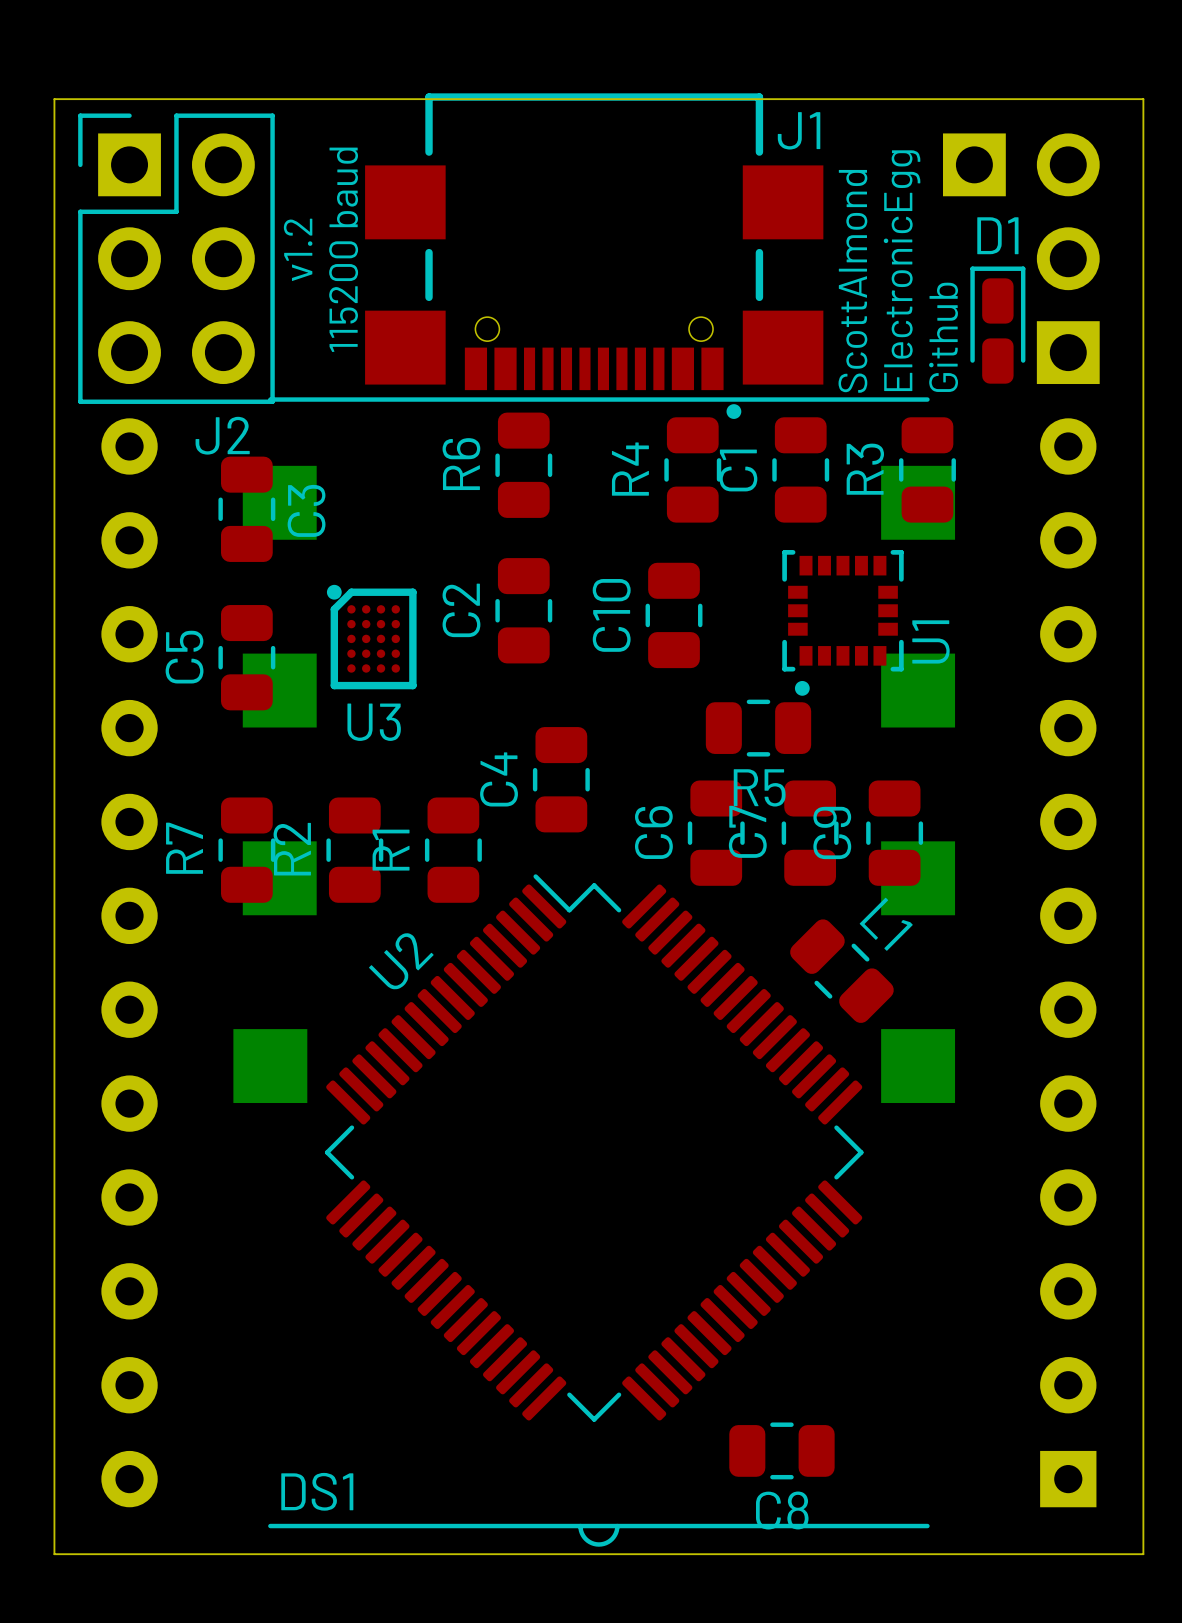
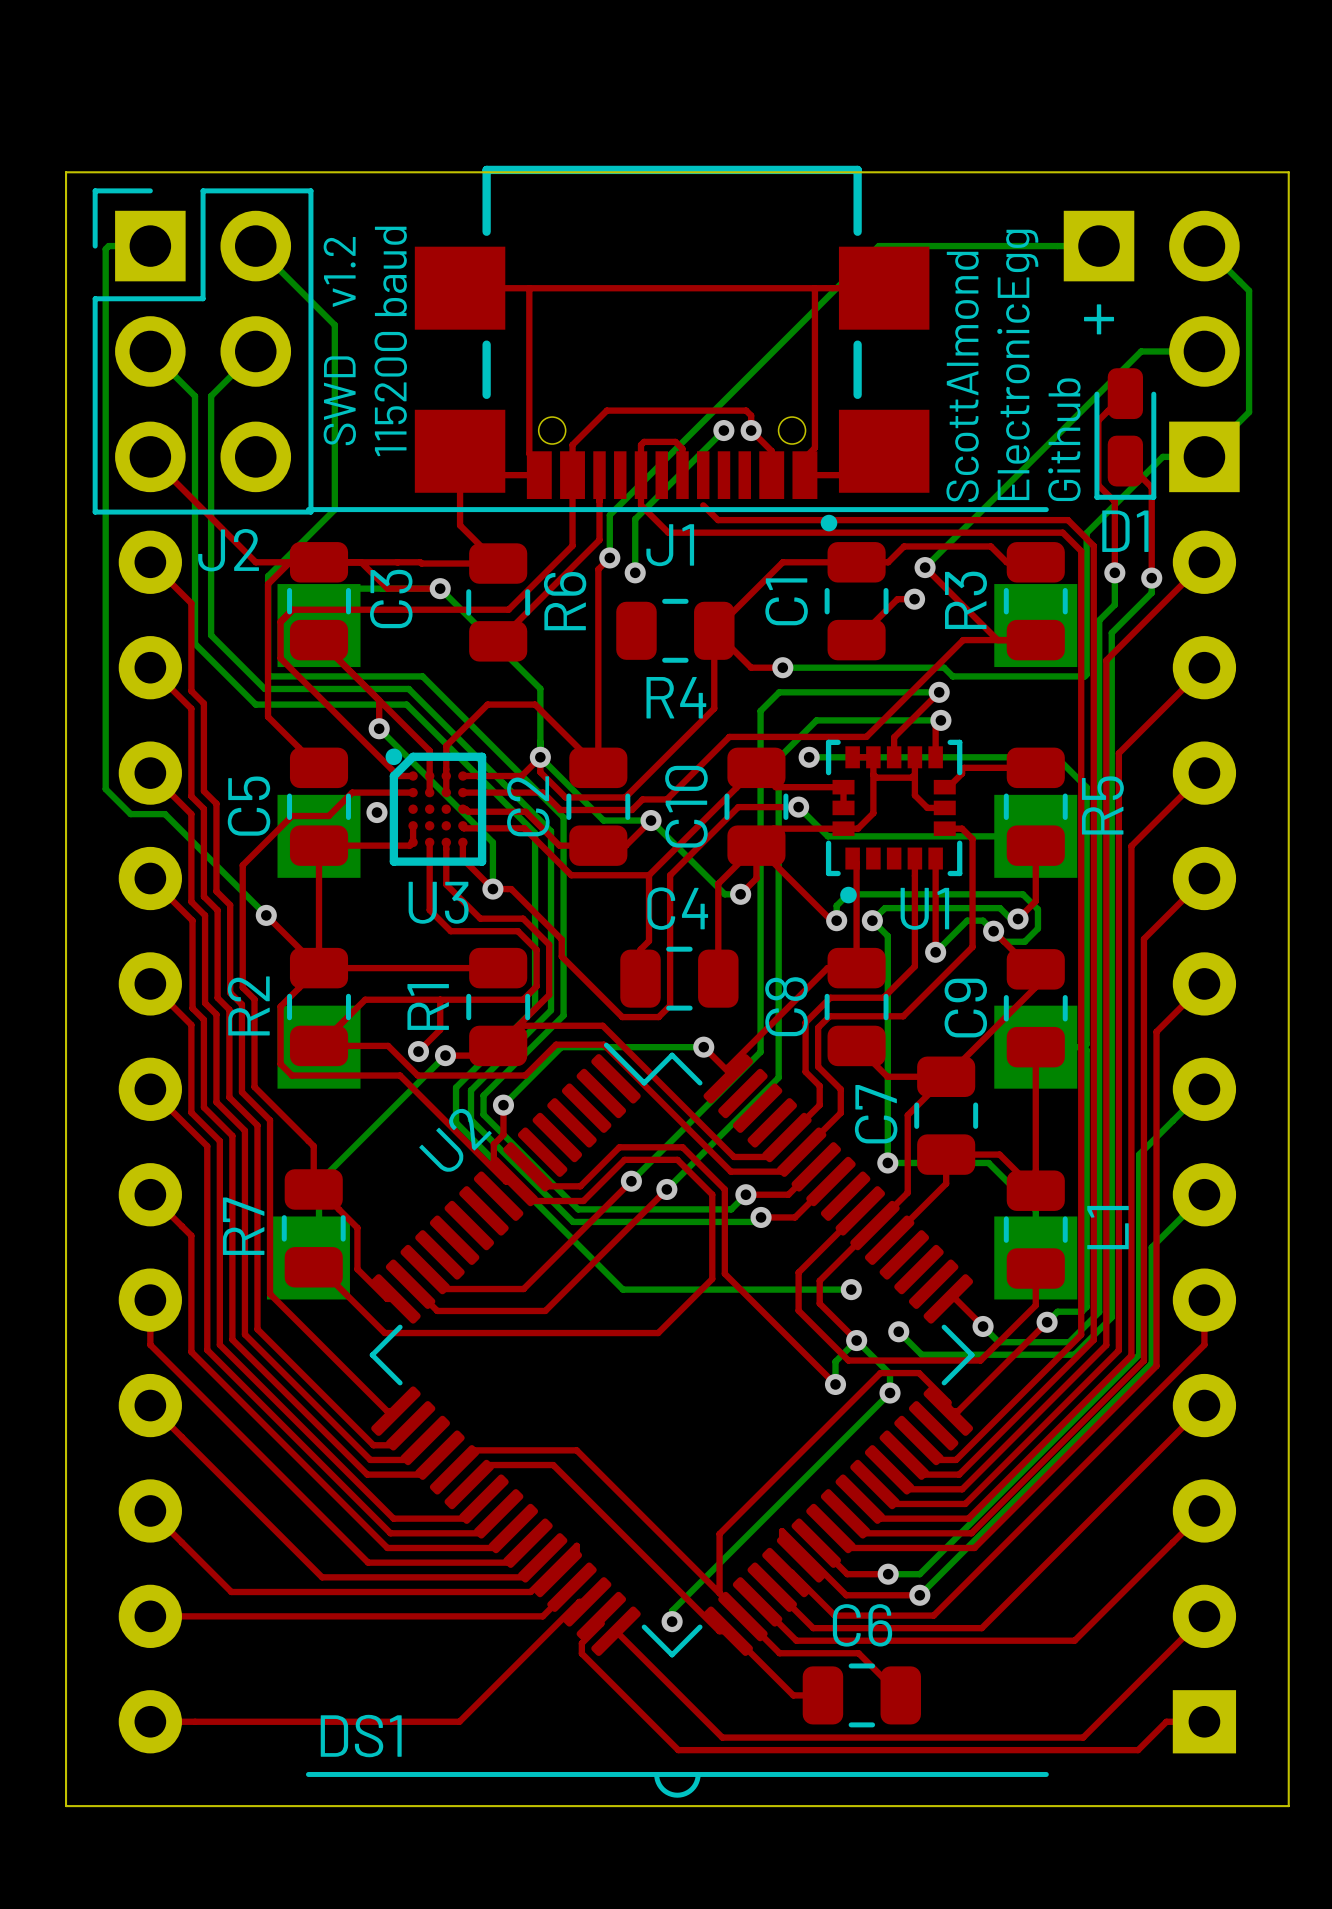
J1 name position: J1 (799, 130) -> J1 (670, 545)
bottom track: none -> (150, 246) (108, 246) (105, 249) (105, 789) (130, 814) (165, 814) (266, 915)
bottom track: none -> (255, 246) (334, 325) (334, 509) (268, 576) (268, 674) (270, 676) (422, 676) (563, 817) (563, 1015) (483, 1095) (483, 1114) (578, 1209) (731, 1209) (745, 1194)
bottom track: none -> (1099, 246) (878, 246) (609, 515) (609, 557)
bottom track: none -> (1204, 246) (1249, 290) (1249, 412) (1204, 456) (1162, 456) (1086, 533) (1086, 674) (1084, 676) (952, 676) (944, 667) (782, 667)
top track: none -> (460, 288) (884, 288)
top track: none -> (529, 288) (529, 453) (539, 463) (539, 475) (483, 475) (460, 451) (460, 525) (498, 563) (255, 562) (150, 456)
top track: none -> (814, 288) (814, 447) (804, 457) (804, 475) (860, 475) (884, 451)
text: none -> + (1099, 319)
text: v1.2 (298, 249) -> SWD v1.2 (339, 341)
bottom track: none -> (150, 351) (195, 396) (195, 643) (255, 704) (406, 704) (535, 833) (535, 1008) (456, 1087) (456, 1122) (622, 1289) (851, 1289)
bottom track: none -> (255, 351) (211, 396) (211, 635) (264, 688) (408, 688) (551, 831) (551, 1010) (470, 1090) (470, 1119) (573, 1221) (756, 1221) (761, 1217)
bottom track: none -> (1204, 351) (1141, 351) (925, 567)
top track: none -> (1125, 393) (1098, 420) (1098, 485) (1114, 501) (1114, 572)
D1 rotation: 0° (997, 325) -> 180° (1125, 434)
bottom track: none -> (723, 430) (635, 519) (635, 572)
via: none -> (723, 430)
via: none -> (751, 430)
top track: none -> (1125, 461) (1151, 487) (1151, 578)
top track: none -> (599, 475) (599, 540) (498, 641)
top track: none -> (682, 475) (682, 448) (675, 441) (644, 441) (640, 444) (640, 505) (668, 532) (1062, 532) (1081, 551) (1081, 1334) (956, 1459) (938, 1459) (918, 1440)
top track: none -> (771, 475) (771, 451) (751, 430) (751, 415) (746, 410) (606, 410) (572, 444) (572, 545) (508, 609) (292, 609) (280, 621) (280, 658) (398, 776) (413, 776)
top track: none -> (703, 505) (718, 520) (1067, 520) (1093, 545) (1093, 1340) (959, 1474) (923, 1474) (904, 1455)
J2 name position: J2 (222, 435) -> J2 (228, 550)
top track: none -> (609, 557) (598, 569) (598, 767) (535, 704) (487, 704) (446, 745) (446, 792)
via: none -> (609, 557)
top track: none -> (150, 562) (191, 603) (191, 690) (203, 703) (203, 791) (216, 803) (216, 891) (230, 905) (230, 992) (241, 1004) (241, 1092) (270, 1120) (270, 1294) (387, 1411) (395, 1411)
top track: none -> (289, 562) (268, 584) (268, 716) (319, 767)
top track: none -> (361, 562) (387, 588) (440, 588)
top track: none -> (1035, 562) (1006, 562) (990, 546) (904, 546) (888, 562) (782, 562) (714, 630)
top track: none -> (1204, 562) (1106, 660) (1106, 1345) (962, 1489) (909, 1489) (889, 1469)
top track: none -> (925, 567) (997, 640)
via: none -> (925, 567)
via: none -> (635, 572)
bottom track: none -> (1114, 572) (1114, 604) (1099, 620) (1099, 1312) (1069, 1342) (998, 1342) (983, 1326)
via: none -> (1114, 572)
bottom track: none -> (1151, 578) (1151, 593) (1111, 632) (1111, 1317) (1074, 1354) (921, 1354) (898, 1331)
via: none -> (1151, 578)
R6 name position: R6 (461, 464) -> R6 (565, 601)
R6 position: (523, 465) -> (498, 602)
via: none -> (440, 588)
R4 name position: R4 (630, 469) -> R4 (676, 697)
R4 rotation: 0° (692, 469) -> 90° clockwise (675, 630)
R4 position: (692, 469) -> (675, 630)
C1 position: (800, 469) -> (856, 601)
R3 position: (927, 469) -> (1035, 601)
top track: none -> (914, 599) (897, 599) (856, 640)
via: none -> (914, 599)
bottom track: none -> (319, 625) (355, 588) (440, 588) (540, 688) (540, 757) (603, 820) (651, 820) (724, 894) (740, 894)
top track: none -> (714, 630) (714, 708) (625, 797) (565, 797) (540, 772) (540, 757) (521, 776) (462, 776)
top track: none -> (714, 630) (751, 667) (782, 667)
C3 position: (246, 509) -> (319, 601)
C3 name position: C3 (306, 510) -> C3 (391, 598)
top track: none -> (319, 640) (429, 750) (429, 792)
top track: none -> (1035, 640) (963, 640) (866, 736) (729, 736) (666, 799)
top track: none -> (150, 667) (191, 708) (191, 796) (203, 808) (203, 896) (217, 910) (217, 997) (229, 1009) (229, 1097) (257, 1125) (257, 1329) (373, 1445) (391, 1445) (410, 1425)
via: none -> (782, 667)
top track: none -> (1204, 667) (1118, 753) (1118, 1350) (965, 1503) (894, 1503) (874, 1484)
top track: none -> (939, 692) (894, 737) (894, 757)
bottom track: none -> (939, 692) (779, 692) (760, 711) (760, 1052) (631, 1181)
via: none -> (939, 692)
top track: none -> (379, 700) (379, 728)
top track: none -> (940, 720) (935, 725) (935, 757)
bottom track: none -> (940, 720) (816, 720) (778, 758) (778, 1077) (666, 1189)
via: none -> (940, 720)
bottom track: none -> (379, 728) (492, 842) (492, 889)
via: none -> (379, 728)
C2 position: (523, 610) -> (598, 806)
C10 position: (674, 615) -> (756, 806)
via: none -> (540, 757)
bottom track: none -> (809, 757) (1056, 757) (1086, 787) (1086, 1044) (1083, 1047)
via: none -> (809, 757)
top track: none -> (852, 757) (873, 757) (873, 813) (857, 828) (773, 828) (718, 883) (718, 978)
top track: none -> (914, 757) (914, 795) (927, 807) (944, 807)
U1 position: (842, 622) -> (894, 821)
top track: none -> (1035, 767) (964, 767) (962, 773) (948, 787) (944, 787)
top track: none -> (150, 773) (191, 814) (191, 901) (205, 915) (205, 1003) (216, 1014) (216, 1102) (244, 1130) (244, 1334) (370, 1459) (405, 1459) (425, 1440)
top track: none -> (1204, 773) (1131, 846) (1131, 1355) (968, 1518) (879, 1518) (860, 1499)
top track: none -> (873, 774) (876, 777) (911, 777) (914, 774)
U3 position: (371, 637) -> (435, 807)
U1 name rotation: 0° (930, 641) -> 90° clockwise (924, 908)
top track: none -> (413, 792) (352, 792) (328, 816) (291, 816) (242, 865) (242, 987) (254, 999) (254, 1086) (313, 1146) (313, 1189)
top track: none -> (462, 792) (543, 792) (560, 810) (632, 810) (642, 799) (668, 799)
C5 position: (246, 657) -> (319, 806)
top track: none -> (798, 807) (738, 807) (670, 875) (670, 1005) (658, 1017) (622, 1017) (561, 956) (561, 939) (511, 889) (492, 889) (462, 859) (462, 842)
bottom track: none -> (798, 807) (827, 836) (1035, 836)
via: none -> (798, 807)
top track: none -> (843, 807) (843, 787) (775, 787) (756, 767) (649, 875)
top track: none -> (462, 809) (468, 811) (525, 811) (559, 845) (625, 845) (651, 820)
via: none -> (376, 812)
via: none -> (651, 820)
top track: none -> (413, 825) (413, 842) (409, 845) (319, 845) (319, 968)
top track: none -> (462, 825) (463, 828) (524, 828) (571, 875) (649, 875)
top track: none -> (944, 828) (962, 828) (972, 839) (972, 947) (903, 1016) (829, 1016) (818, 1027) (818, 1066) (840, 1089) (840, 1113) (782, 1171) (730, 1171) (603, 1044) (556, 1044) (525, 1075) (417, 1075) (388, 1045) (319, 1045) (365, 999) (523, 999) (536, 986) (536, 949) (517, 931) (450, 931) (429, 910) (429, 842)
top track: none -> (446, 842) (446, 884) (480, 918) (523, 918) (549, 944) (549, 994) (488, 1055) (445, 1055)
top track: none -> (1035, 845) (1035, 901) (1018, 919)
top track: none -> (852, 858) (856, 862) (856, 968) (827, 968) (728, 1067) (728, 1078)
top track: none -> (914, 858) (914, 966) (883, 997) (830, 997) (805, 1022) (805, 1071) (819, 1085) (819, 1105) (767, 1156) (733, 1156) (602, 1025) (518, 1025)
top track: none -> (935, 858) (935, 952)
top track: none -> (649, 875) (649, 941) (640, 949) (640, 978)
top track: none -> (150, 878) (192, 920) (192, 1008) (203, 1019) (203, 1107) (232, 1135) (232, 1339) (367, 1474) (420, 1474) (439, 1455)
R5 rotation: 0° (758, 728) -> 90° clockwise (1035, 806)
R5 position: (758, 728) -> (1035, 806)
top track: none -> (1204, 878) (1143, 938) (1143, 1360) (971, 1533) (865, 1533) (845, 1513)
via: none -> (492, 889)
top track: none -> (740, 894) (756, 878) (756, 845) (831, 920) (836, 920)
via: none -> (740, 894)
top track: none -> (266, 915) (319, 968)
via: none -> (266, 915)
bottom track: none -> (1018, 919) (1012, 920) (1000, 908) (884, 908) (872, 920) (887, 936) (887, 1162) (988, 1162) (1035, 1210) (1035, 1257)
via: none -> (1018, 919)
bottom track: none -> (836, 920) (836, 905) (848, 894) (1022, 894) (1037, 909) (1037, 928) (1024, 941) (1004, 941) (983, 920) (967, 920) (935, 952)
via: none -> (836, 920)
via: none -> (872, 920)
top track: none -> (993, 931) (1031, 969) (1035, 969) (1035, 987) (907, 1115) (907, 1192) (819, 1280) (819, 1303) (856, 1340)
via: none -> (993, 931)
C4 rotation: 0° (561, 779) -> 90° clockwise (679, 978)
R5 name position: R5 (759, 787) -> R5 (1102, 805)
via: none -> (935, 952)
top track: none -> (319, 968) (498, 968)
top track: none -> (319, 968) (280, 1006) (280, 1064) (291, 1075) (400, 1075) (506, 1181) (513, 1181)
top track: none -> (150, 983) (191, 1024) (191, 1112) (219, 1141) (219, 1344) (393, 1518) (464, 1518) (483, 1499)
top track: none -> (1204, 983) (1156, 1031) (1156, 1366) (974, 1547) (850, 1547) (830, 1528)
C6 rotation: 0° (716, 833) -> 90° clockwise (861, 1695)
C6 position: (716, 833) -> (861, 1695)
C7 position: (810, 833) -> (946, 1115)
C9 position: (894, 833) -> (1035, 1008)
top track: none -> (440, 999) (440, 1029) (418, 1051)
R7 position: (246, 850) -> (313, 1228)
R2 position: (354, 850) -> (319, 1007)
R1 position: (453, 850) -> (498, 1007)
top track: none -> (856, 1045) (887, 1076) (946, 1076)
top track: none -> (703, 1047) (728, 1071)
bottom track: none -> (703, 1047) (561, 1047) (503, 1105)
via: none -> (703, 1047)
top track: none -> (1035, 1047) (1035, 1190) (999, 1154) (946, 1154) (946, 1183) (889, 1240)
bottom track: none -> (1083, 1047) (1086, 1050) (1086, 1306) (1081, 1311) (1057, 1311) (1047, 1322)
via: none -> (418, 1051)
bottom track: none -> (445, 1055) (319, 1182) (319, 1257)
via: none -> (445, 1055)
top track: none -> (150, 1089) (207, 1146) (207, 1350) (390, 1533) (479, 1533) (498, 1513)
bottom track: none -> (1204, 1089) (1139, 1154) (1139, 1354) (919, 1574) (888, 1574)
top track: none -> (503, 1105) (503, 1134) (493, 1144) (493, 1162) (532, 1200) (583, 1200) (624, 1159) (677, 1159) (712, 1194) (712, 1278) (658, 1333) (384, 1333) (319, 1267)
via: none -> (503, 1105)
L1 rotation: 0° (841, 971) -> 45° clockwise (1035, 1229)
L1 position: (841, 971) -> (1035, 1229)
via: none -> (887, 1162)
top track: none -> (527, 1166) (547, 1186) (580, 1186) (619, 1147) (682, 1147) (724, 1189) (724, 1273) (835, 1384)
top track: none -> (816, 1166) (788, 1194) (745, 1194)
top track: none -> (631, 1181) (523, 1289) (444, 1289) (425, 1269)
via: none -> (631, 1181)
top track: none -> (830, 1181) (795, 1217) (761, 1217)
top track: none -> (319, 1189) (357, 1227) (357, 1269) (387, 1298) (395, 1298)
top track: none -> (666, 1189) (545, 1310) (437, 1310) (410, 1284)
via: none -> (666, 1189)
top track: none -> (150, 1194) (191, 1235) (191, 1351) (387, 1547) (493, 1547) (513, 1528)
via: none -> (745, 1194)
bottom track: none -> (1204, 1194) (1151, 1247) (1151, 1363) (919, 1595)
top track: none -> (860, 1210) (798, 1272) (798, 1310) (848, 1360) (980, 1360) (1035, 1305) (1035, 1268)
via: none -> (761, 1217)
via: none -> (851, 1289)
top track: none -> (948, 1298) (955, 1298) (983, 1326)
top track: none -> (150, 1300) (150, 1344) (368, 1562) (508, 1562) (527, 1543)
top track: none -> (1204, 1300) (1204, 1344) (933, 1615) (834, 1615) (791, 1572) (786, 1572)
top track: none -> (1047, 1322) (958, 1411) (948, 1411) (948, 1402) (919, 1373) (880, 1373) (719, 1533) (719, 1593)
via: none -> (1047, 1322)
via: none -> (983, 1326)
via: none -> (898, 1331)
via: none -> (856, 1340)
bottom track: none -> (835, 1384) (835, 1361) (856, 1340) (890, 1373) (890, 1393) (672, 1610) (672, 1621)
via: none -> (835, 1384)
via: none -> (890, 1393)
top track: none -> (150, 1405) (322, 1577) (523, 1577) (542, 1557)
top track: none -> (1204, 1405) (981, 1628) (813, 1628) (772, 1587)
top track: none -> (454, 1469) (474, 1450) (576, 1450) (779, 1653) (858, 1653) (900, 1695)
top track: none -> (469, 1484) (488, 1465) (553, 1465) (719, 1631) (729, 1631) (793, 1695) (822, 1695)
top track: none -> (150, 1510) (231, 1592) (530, 1592) (576, 1545) (576, 1553) (557, 1572)
top track: none -> (1204, 1510) (1074, 1640) (796, 1640) (757, 1601)
top track: none -> (816, 1543) (847, 1574) (888, 1574)
top track: none -> (801, 1557) (782, 1538) (782, 1531) (846, 1595) (919, 1595)
via: none -> (888, 1574)
top track: none -> (571, 1587) (542, 1616) (150, 1616)
via: none -> (919, 1595)
top track: none -> (586, 1601) (579, 1601) (459, 1721) (150, 1721)
top track: none -> (601, 1616) (601, 1623) (581, 1643) (581, 1653) (678, 1750) (1138, 1750) (1166, 1721) (1204, 1721)
top track: none -> (1204, 1616) (1083, 1737) (722, 1737) (616, 1631)
via: none -> (672, 1621)
C8 rotation: 0° (781, 1450) -> 90° clockwise (856, 1007)
C8 position: (781, 1450) -> (856, 1007)

